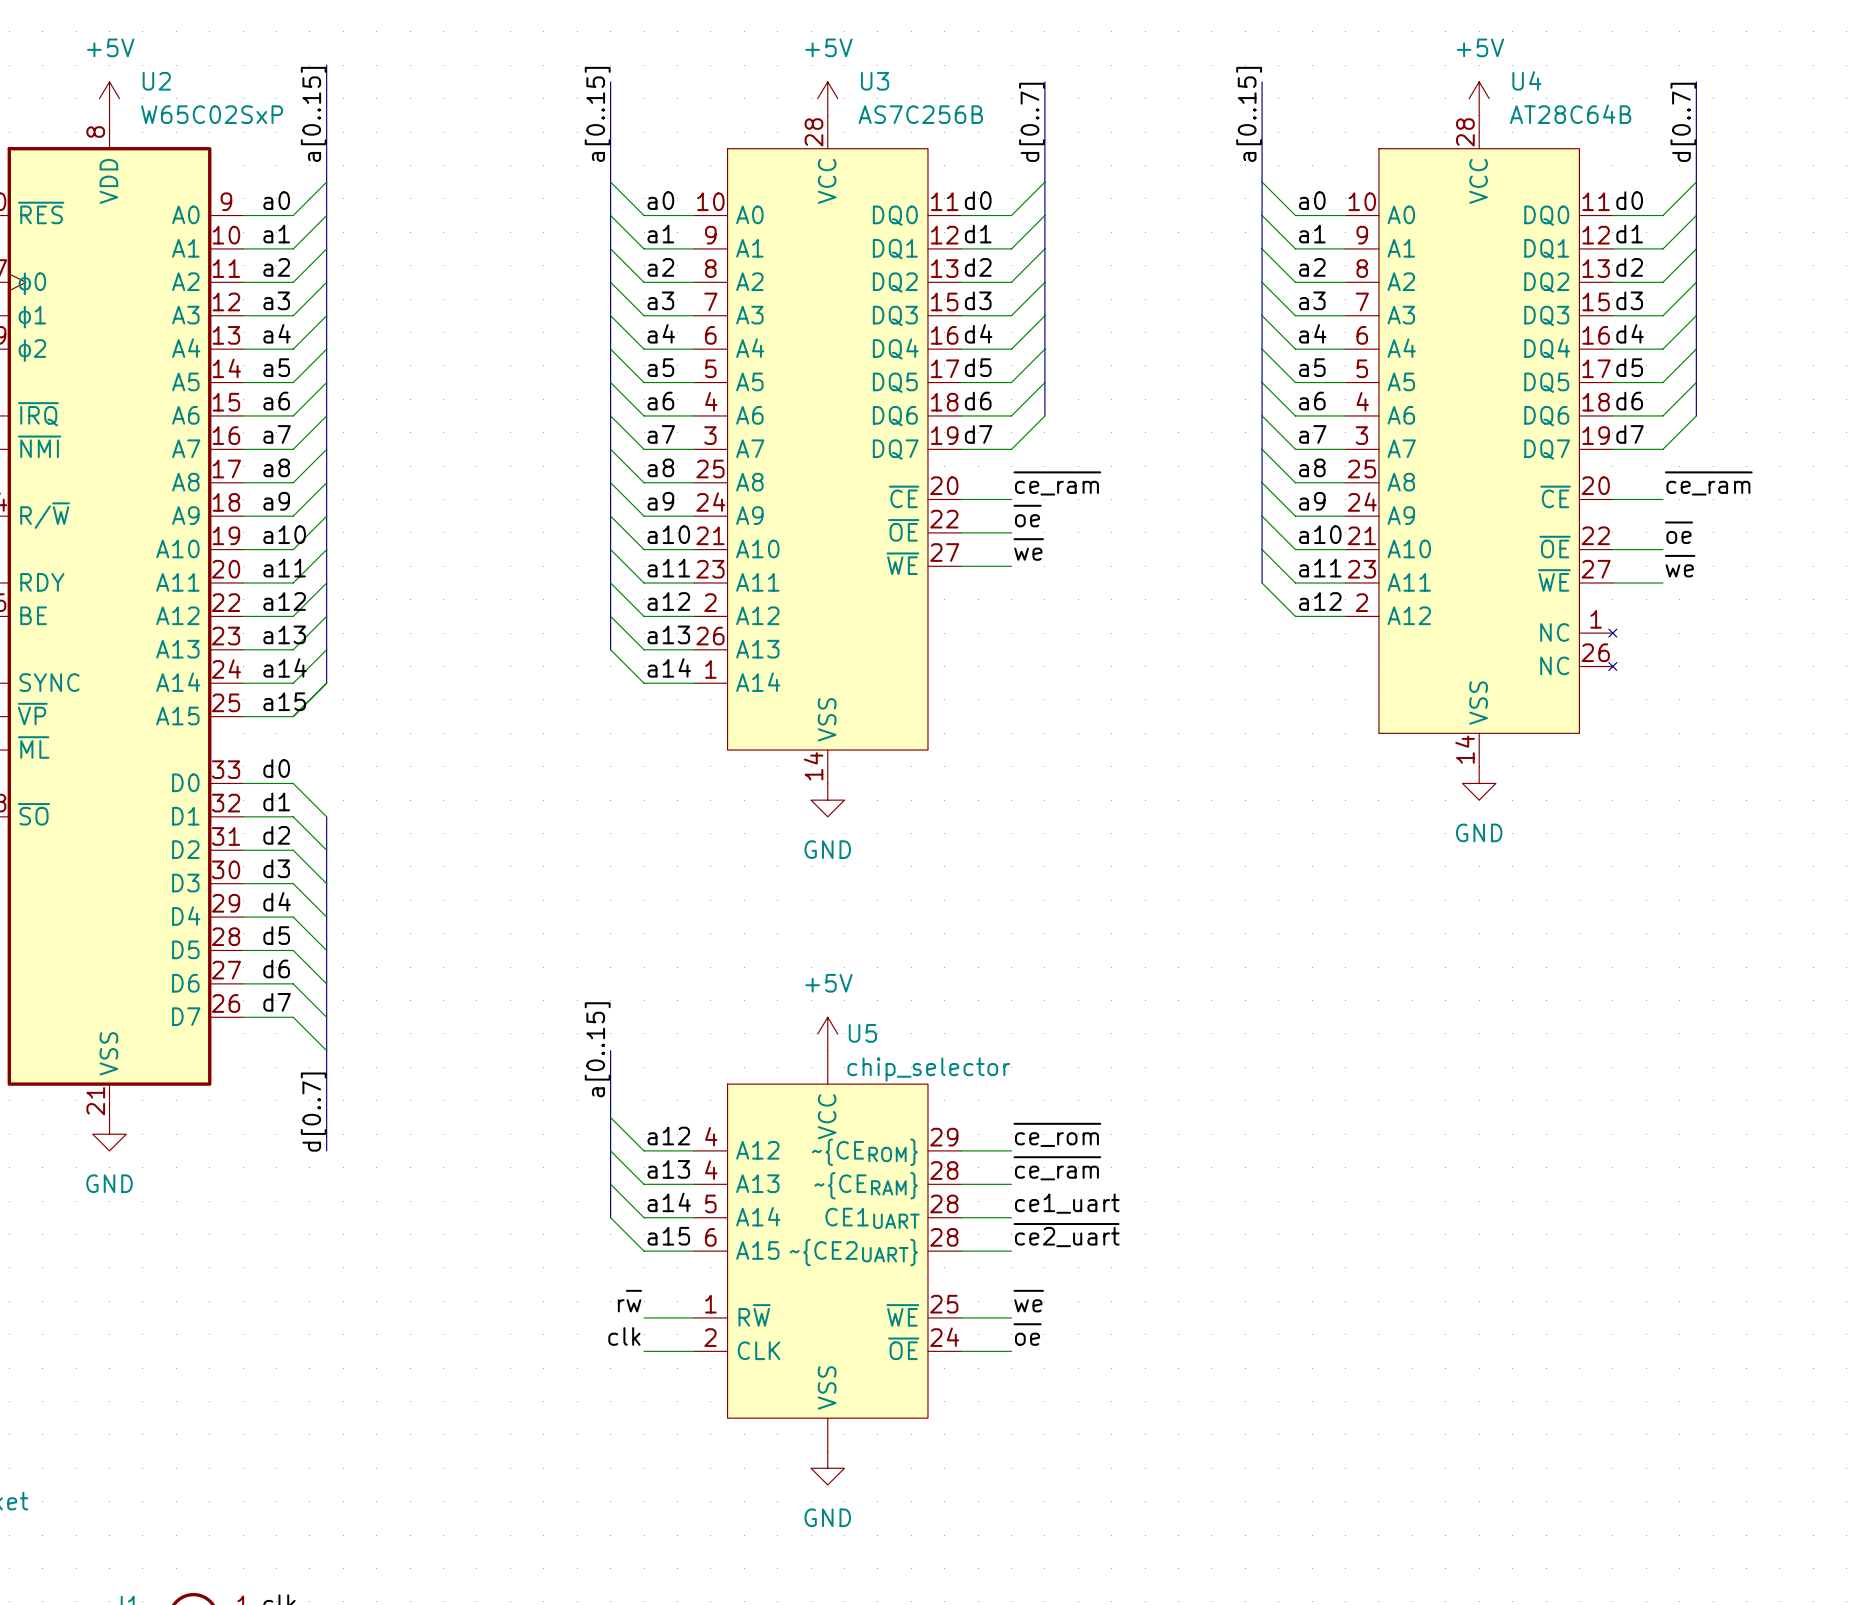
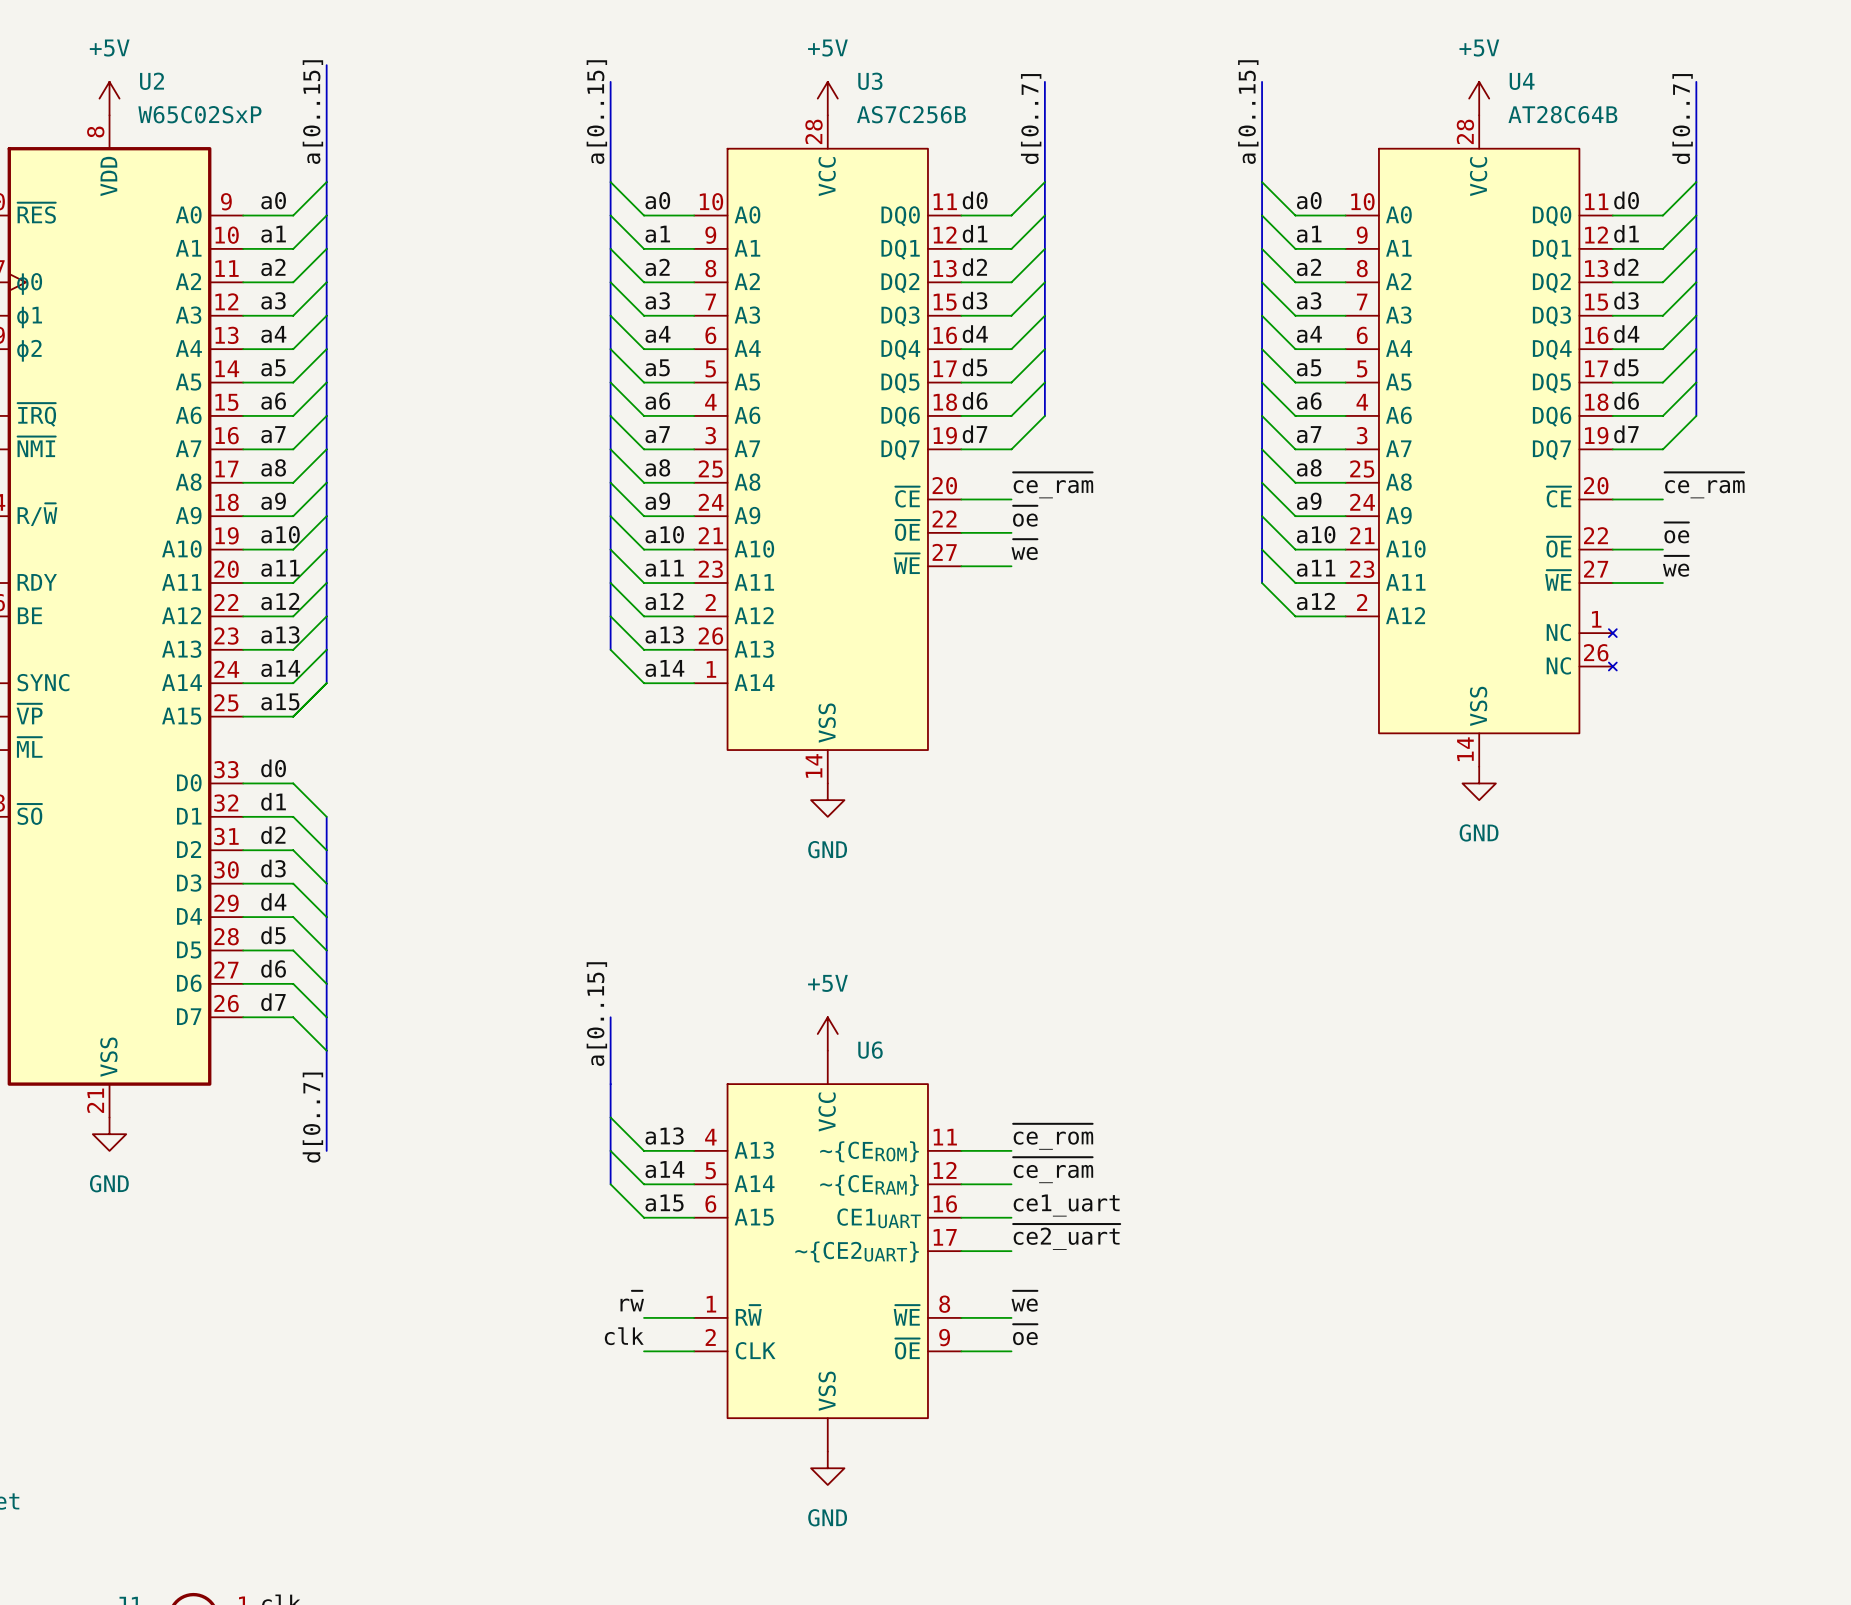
label position: a[0..15] (597, 1049) -> a[0..15] (596, 1014)
label: a12 (668, 1136) -> a13 (664, 1136)
label: a13 (668, 1169) -> a14 (664, 1169)
bus: (610, 1184) (610, 1217) -> (610, 1017) (610, 1050)
label: a14 (669, 1202) -> a15 (664, 1202)
wire: (610, 1217) (644, 1251) (694, 1251) -> none
label: a15 (668, 1236) -> none
U5: chip_selector (827, 1251) -> none
U6: none -> (827, 1251)

